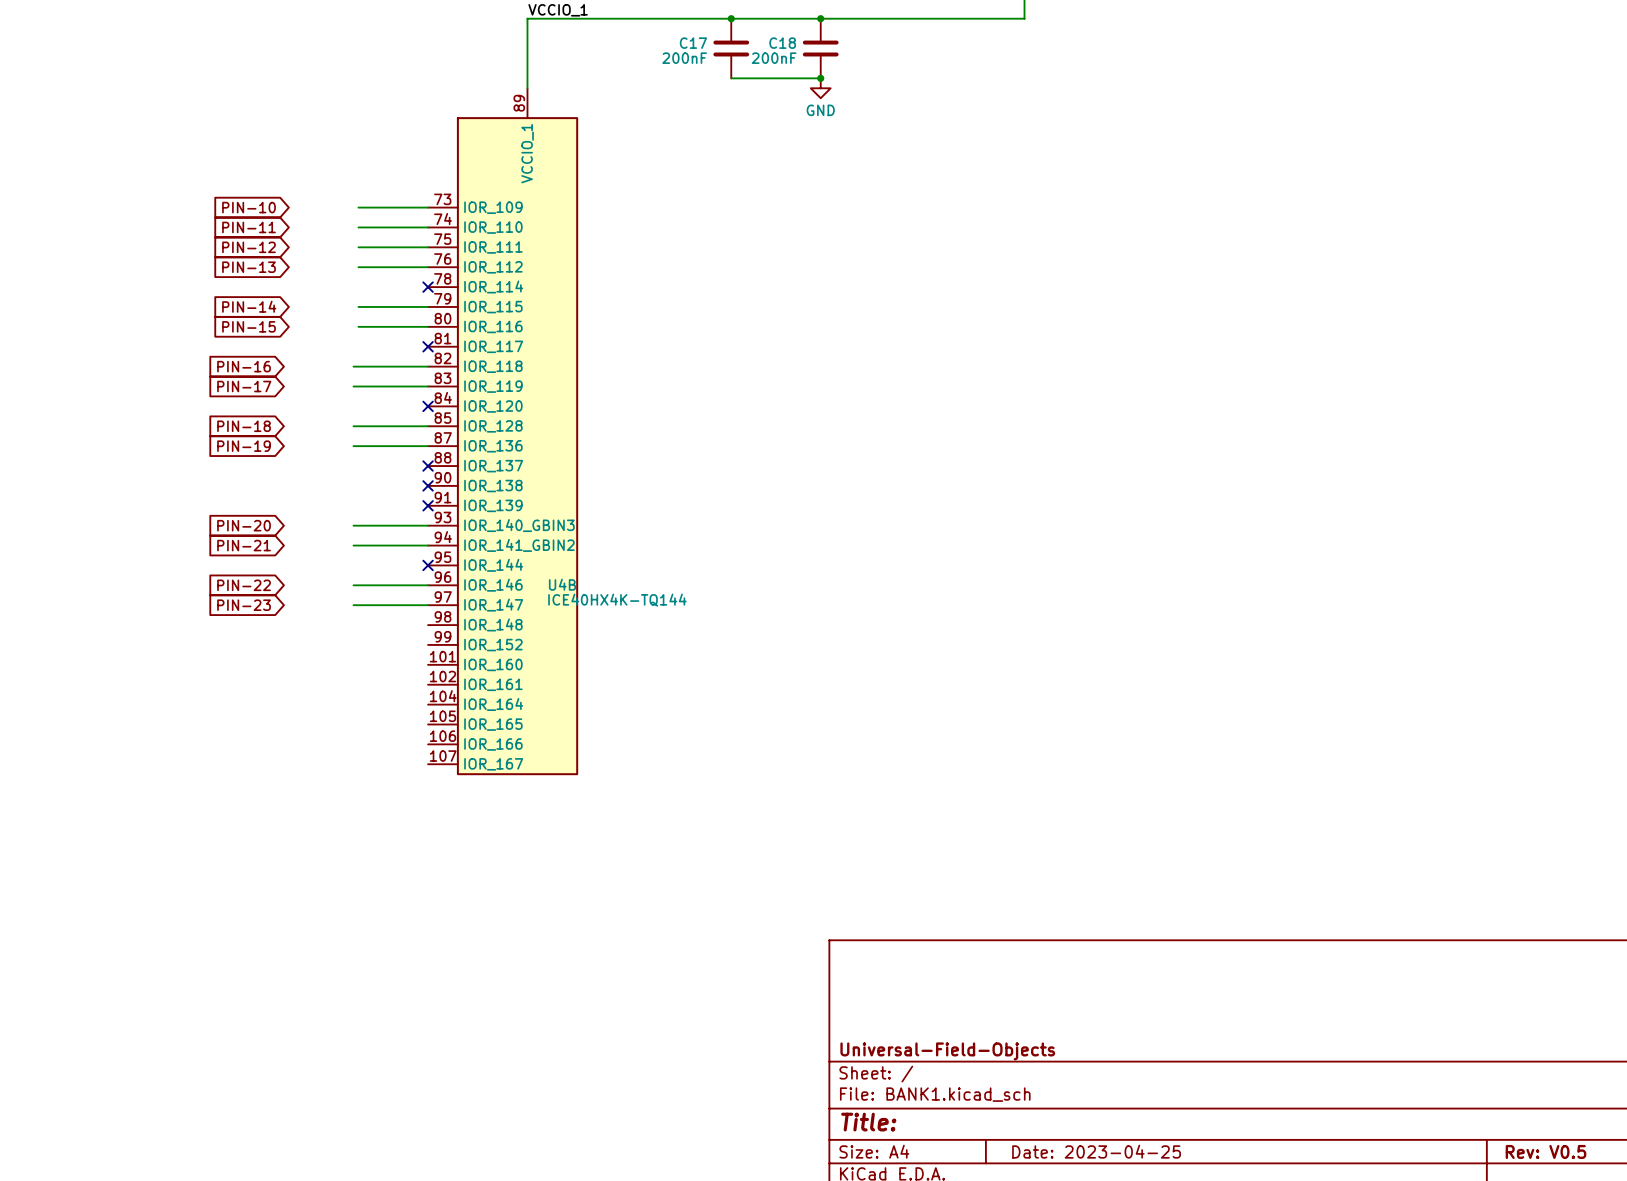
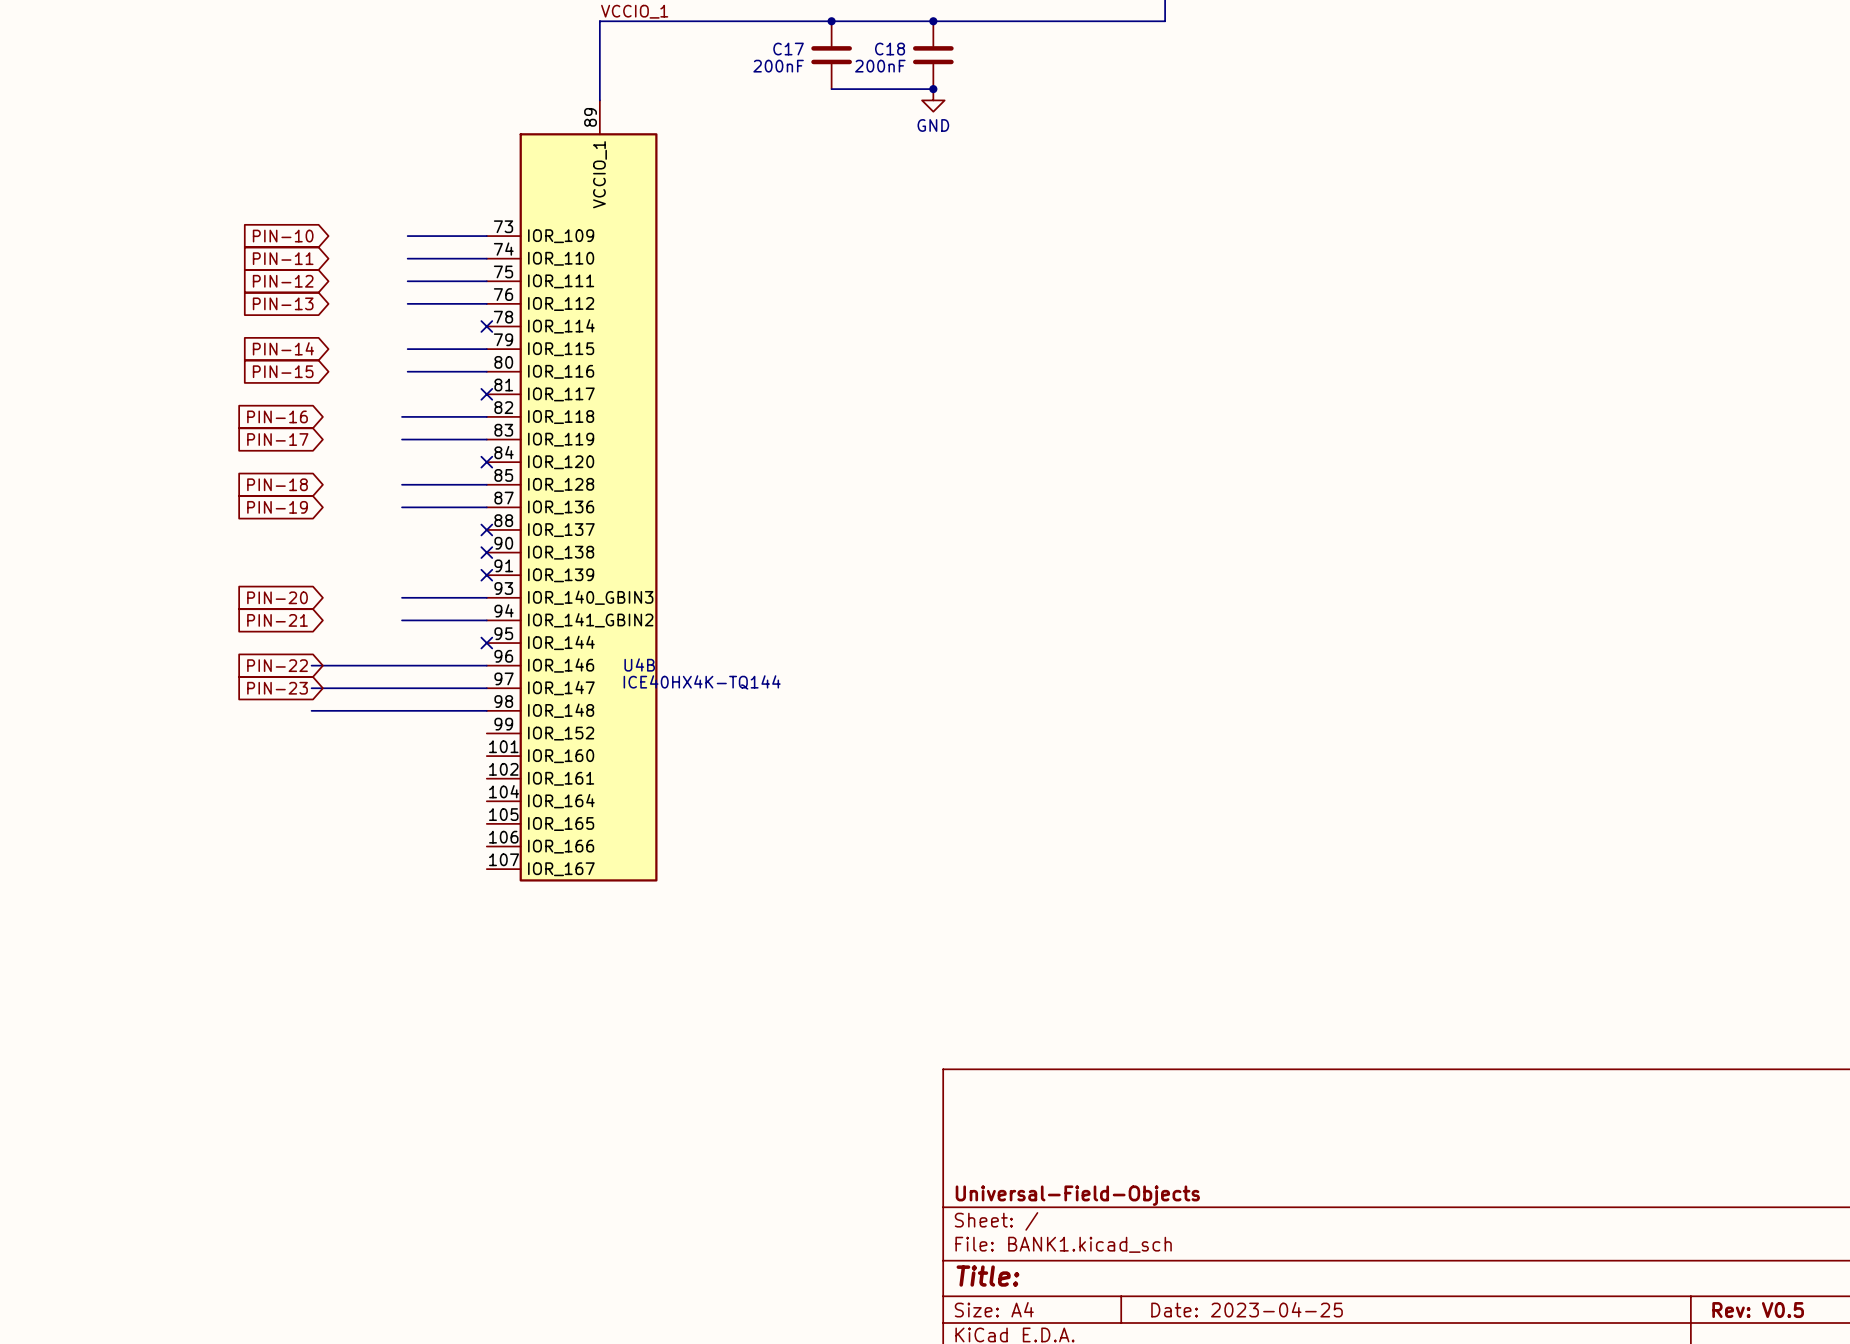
wire: none -> (311, 665) (402, 665)
wire: none -> (311, 688) (402, 688)
wire: none -> (311, 710) (486, 710)

